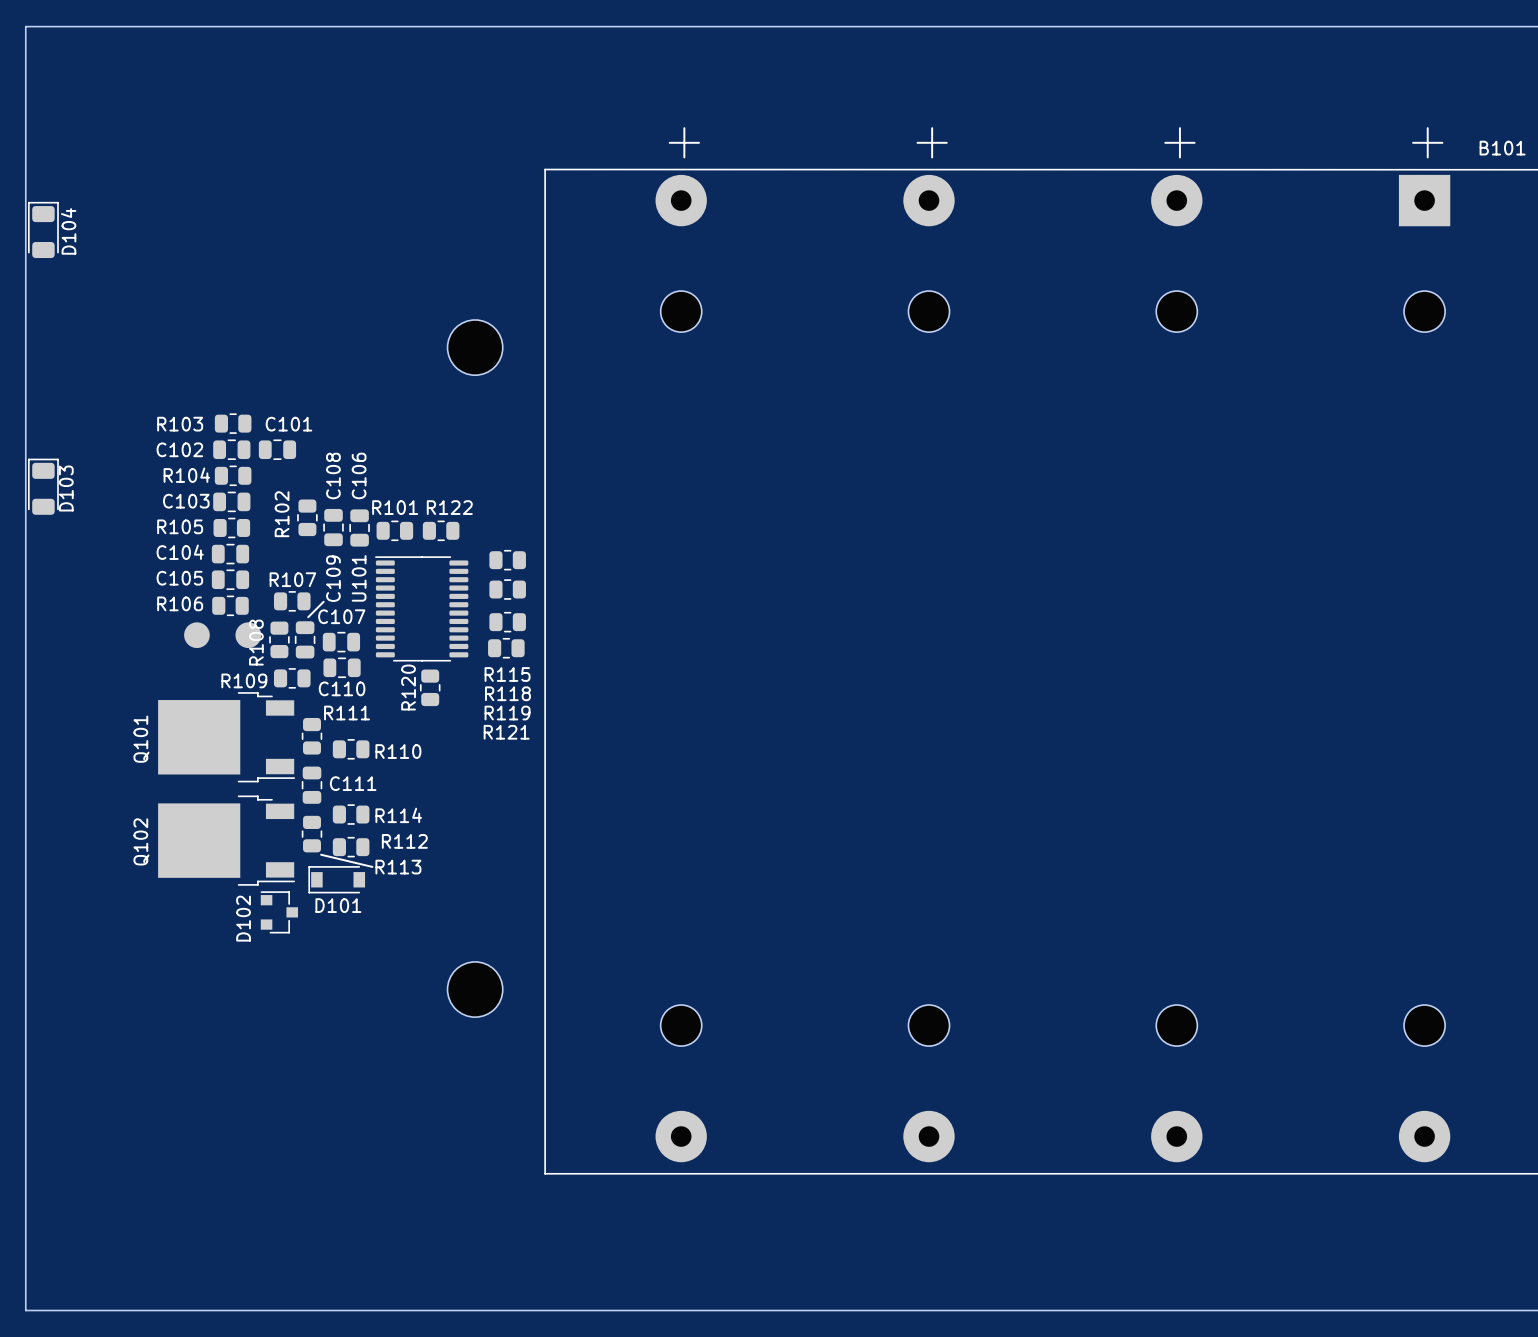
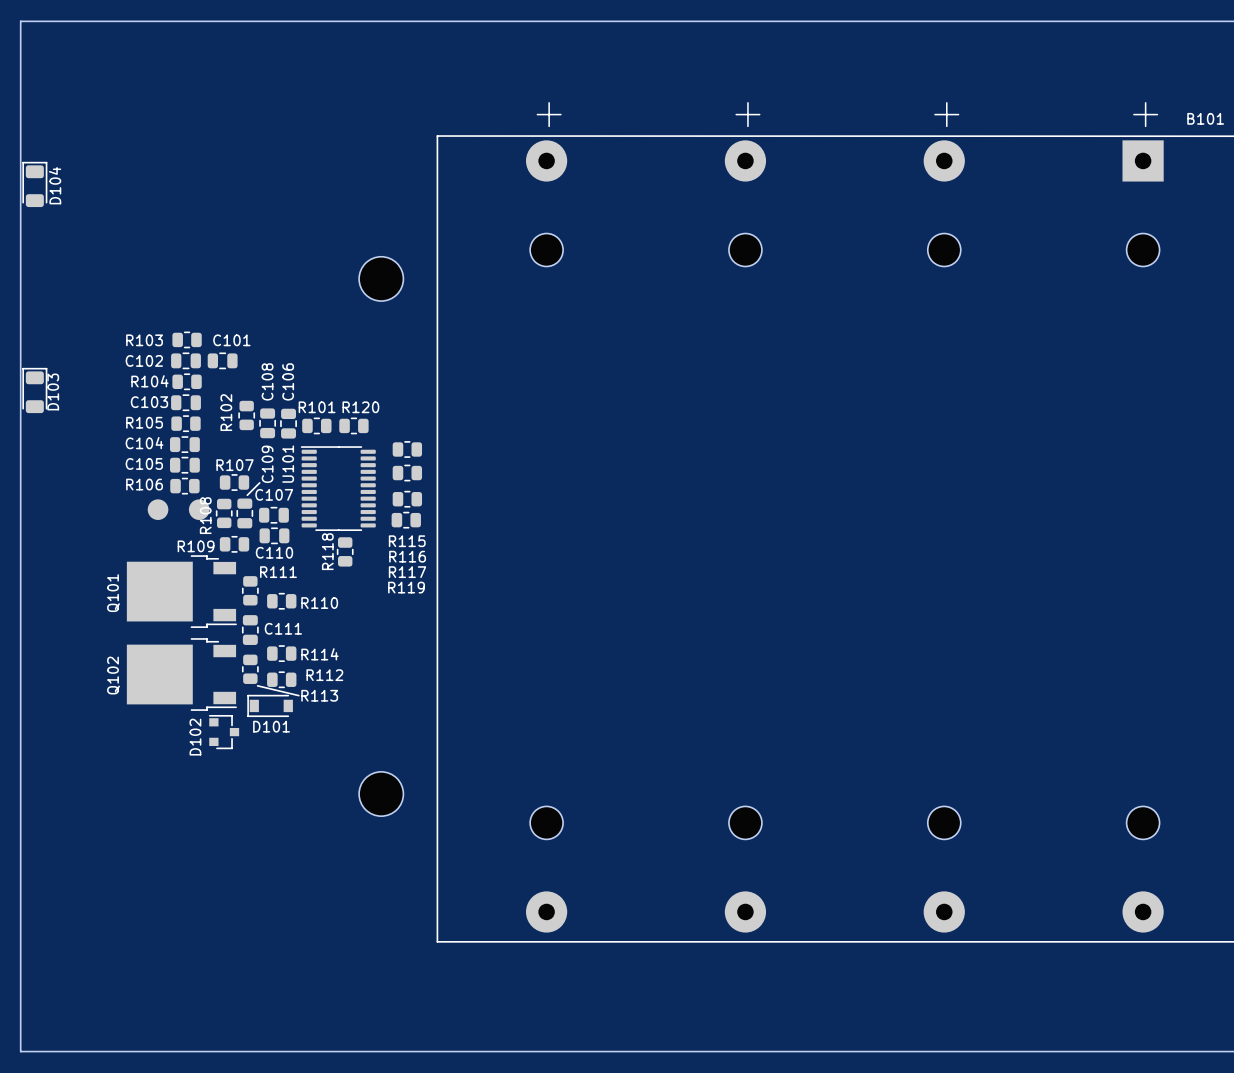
R122 name: R122 (449, 507) -> R120 (360, 407)
R120 name: R120 (408, 687) -> R118 (327, 551)
R118 name: R118 (507, 693) -> R116 (407, 556)
R119 name: R119 (507, 713) -> R117 (407, 572)
R121 name: R121 (506, 732) -> R119 (406, 587)

